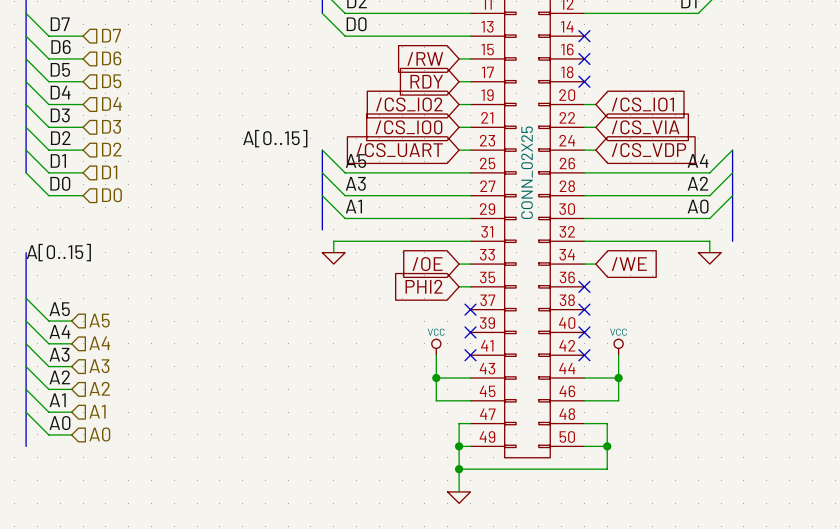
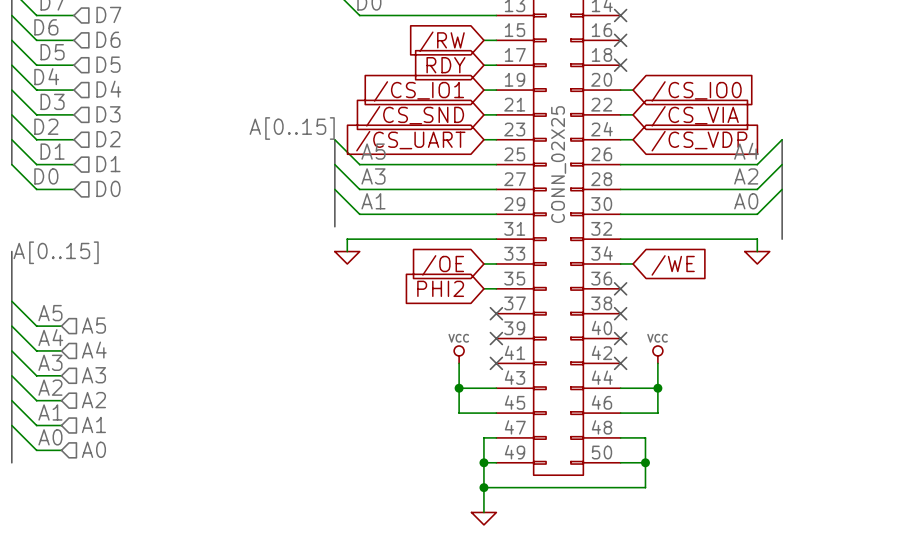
global label: /CS_IO2 (409, 104) -> /CS_IO1 (418, 91)
global label: /CS_IO1 (642, 104) -> /CS_IO0 (696, 91)
global label: /CS_IO0 (408, 127) -> /CS_SND (415, 116)

